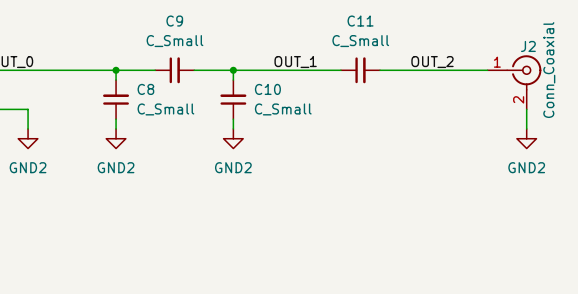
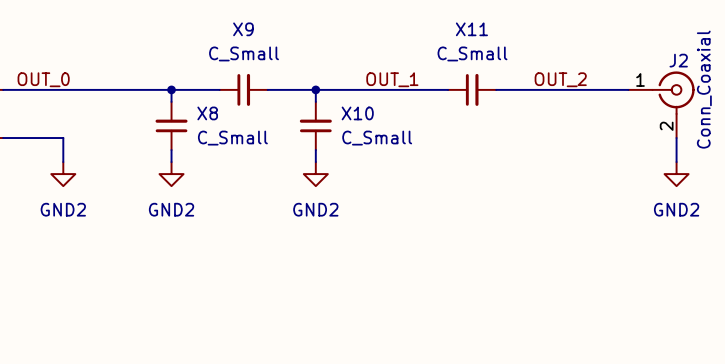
C9 name: C9 (174, 21) -> X9 (243, 29)
C11 name: C11 (360, 21) -> X11 (471, 29)
C8 name: C8 (145, 89) -> X8 (207, 113)
C10 name: C10 (267, 89) -> X10 (357, 113)

